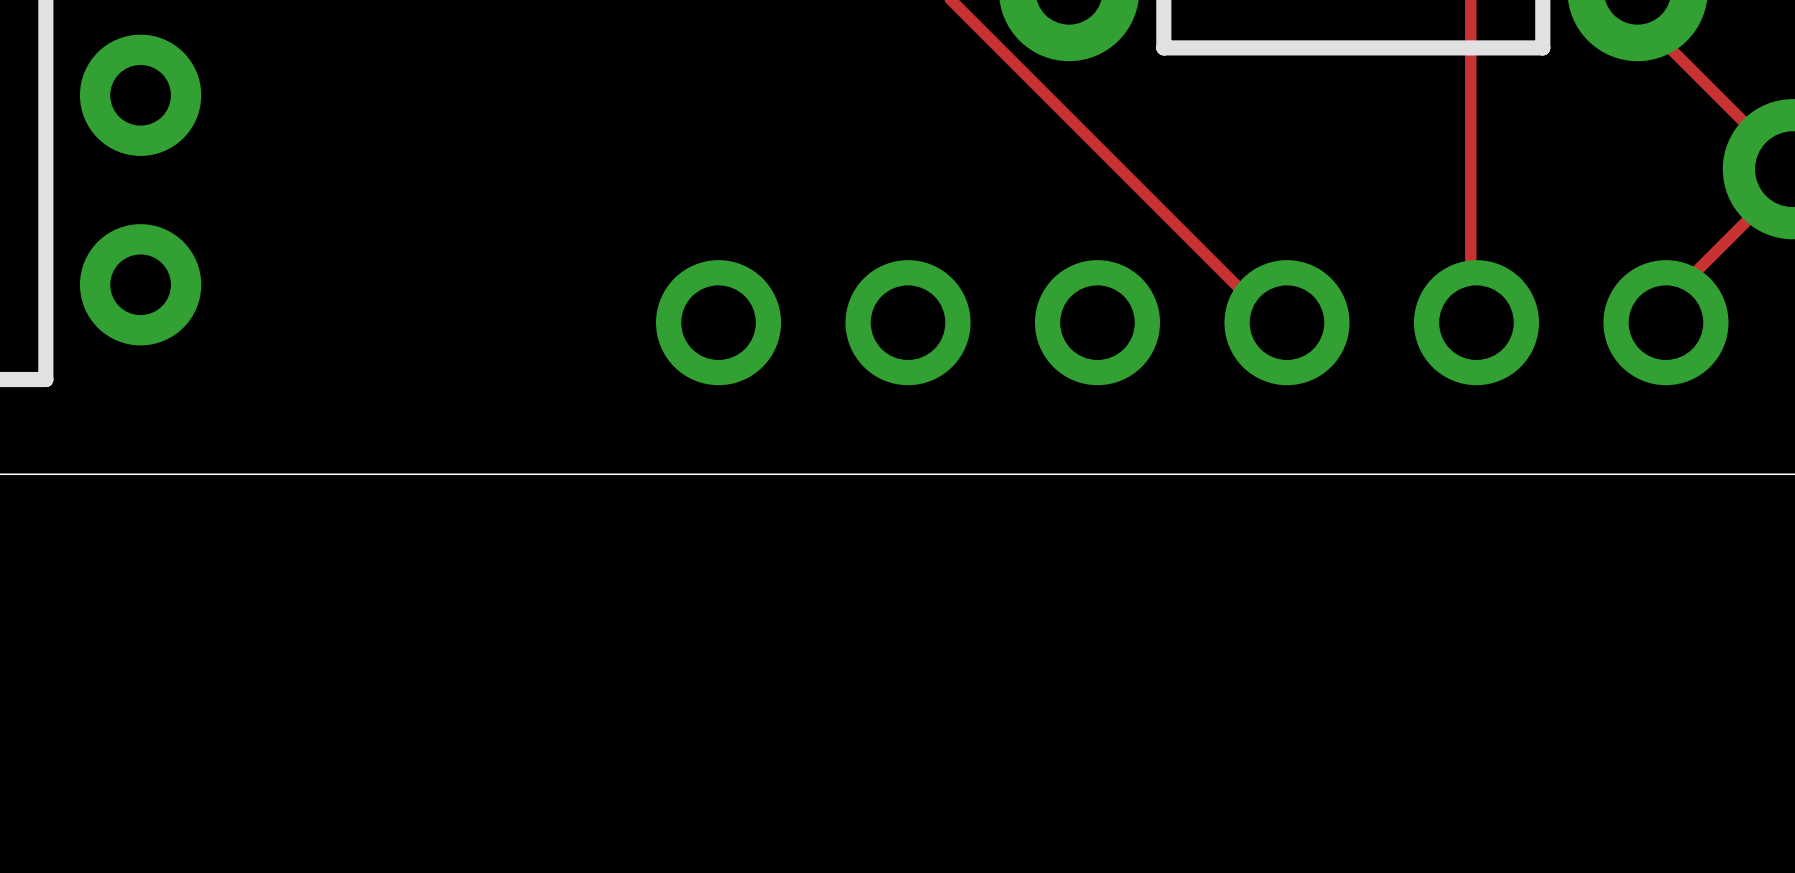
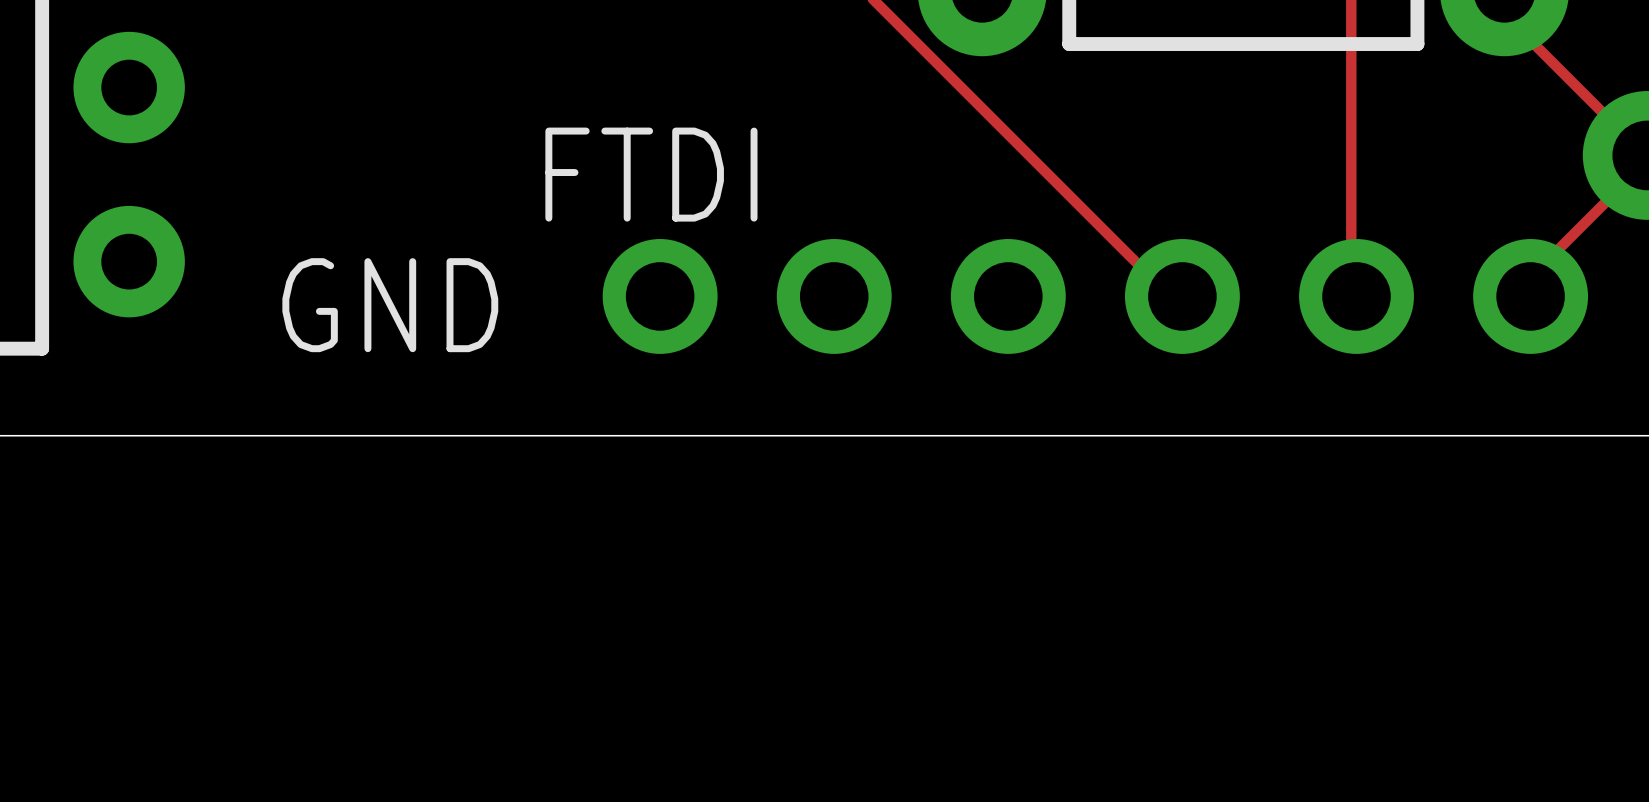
text: none -> FTDI (651, 174)
text: none -> GND (390, 305)

